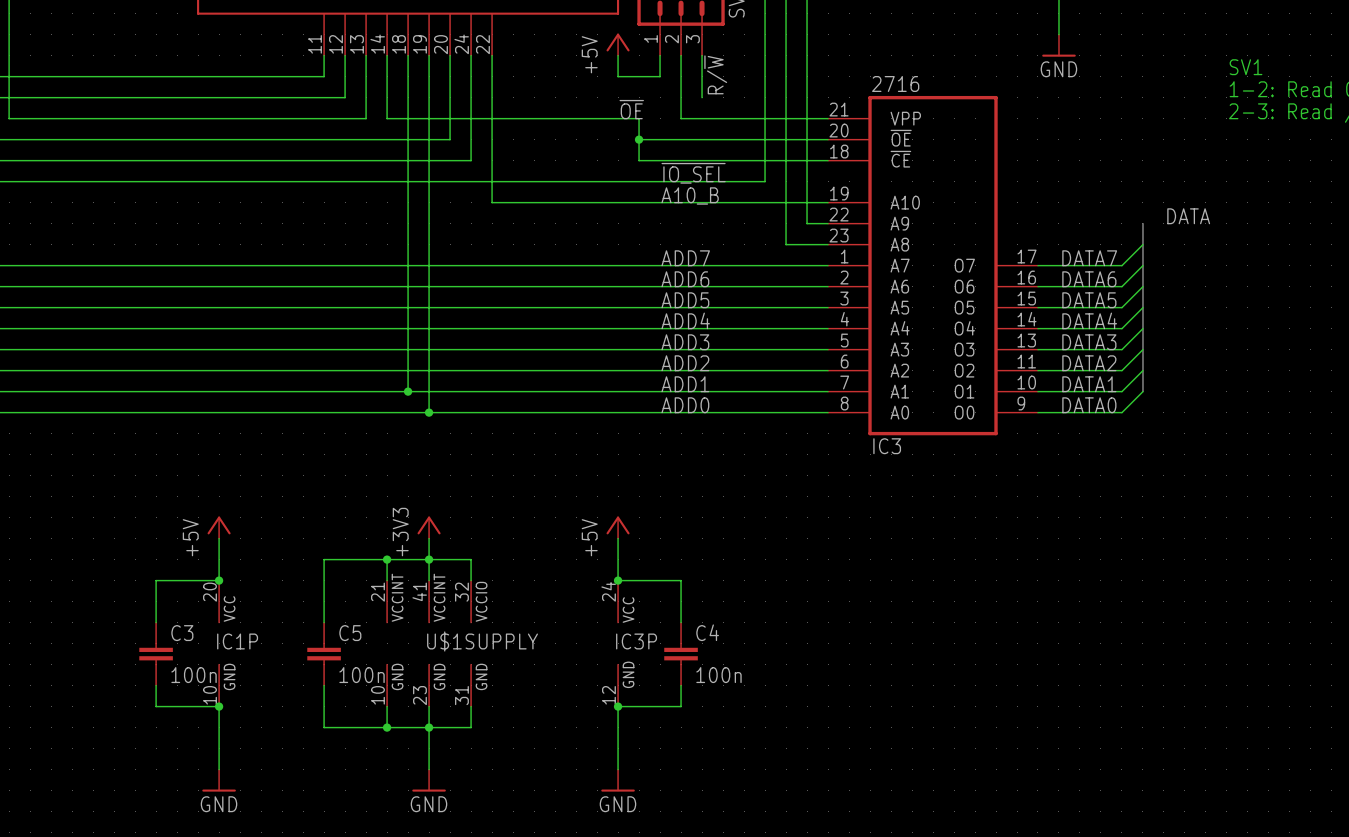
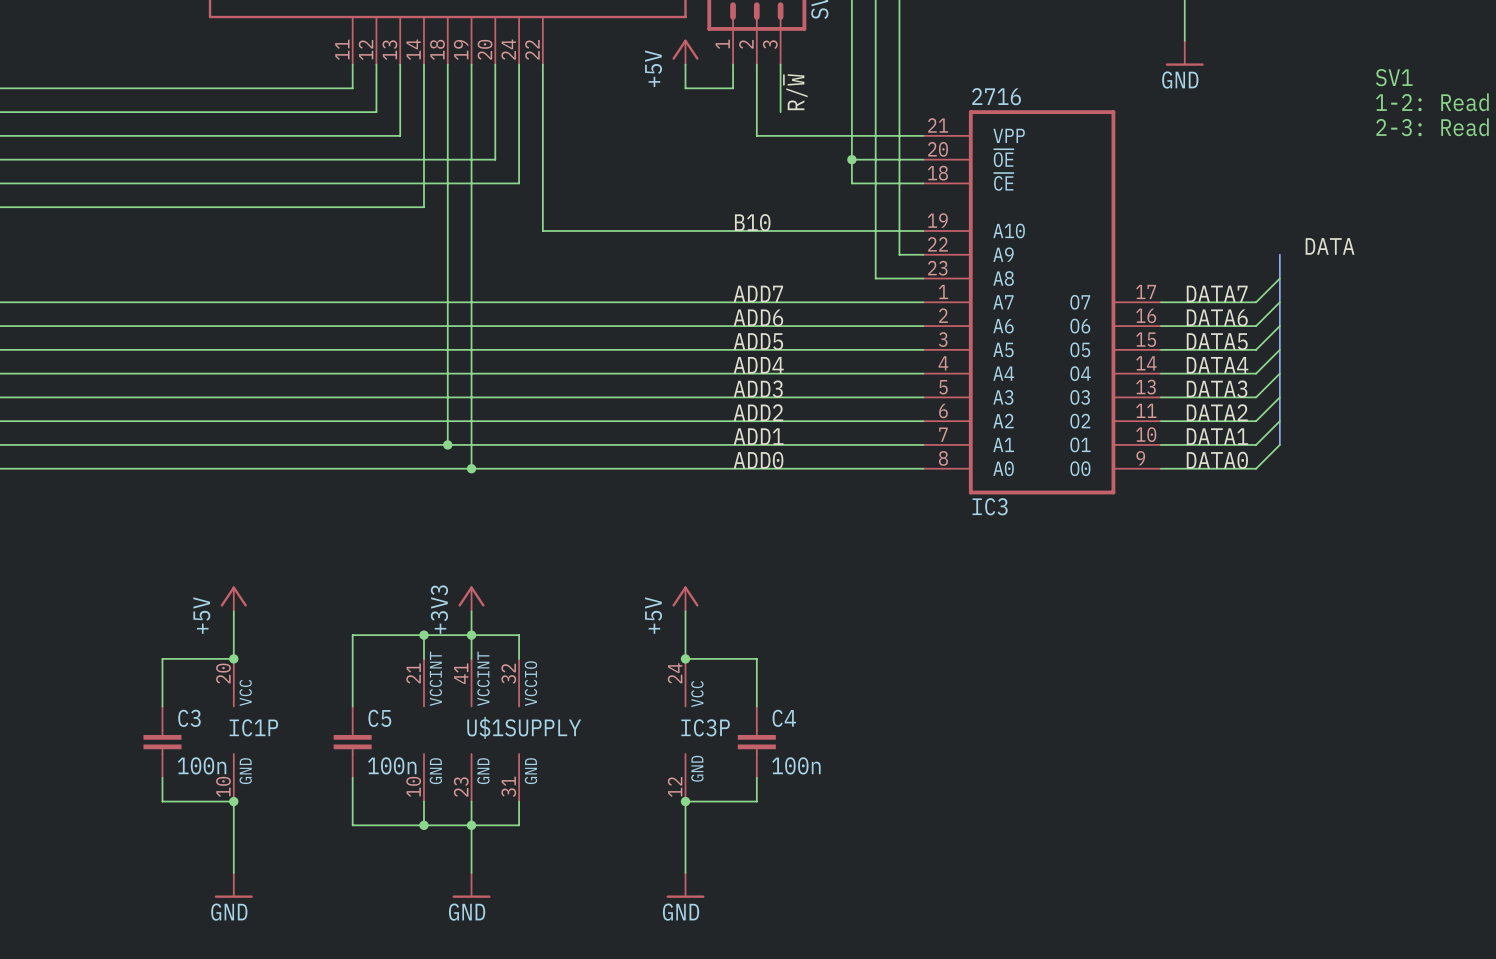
label: ~{OE} (631, 109) -> none
wire: (387, 118) (639, 118) (639, 160) (765, 160) (765, 181) (387, 181) -> (423, 135) (423, 207)
wire: (639, 139) (765, 139) -> none
junction: (639, 139) -> none
junction: none -> (851, 159)
label: ~{IO_SEL} (693, 173) -> none
label: A10_B (690, 195) -> B10 (752, 222)

